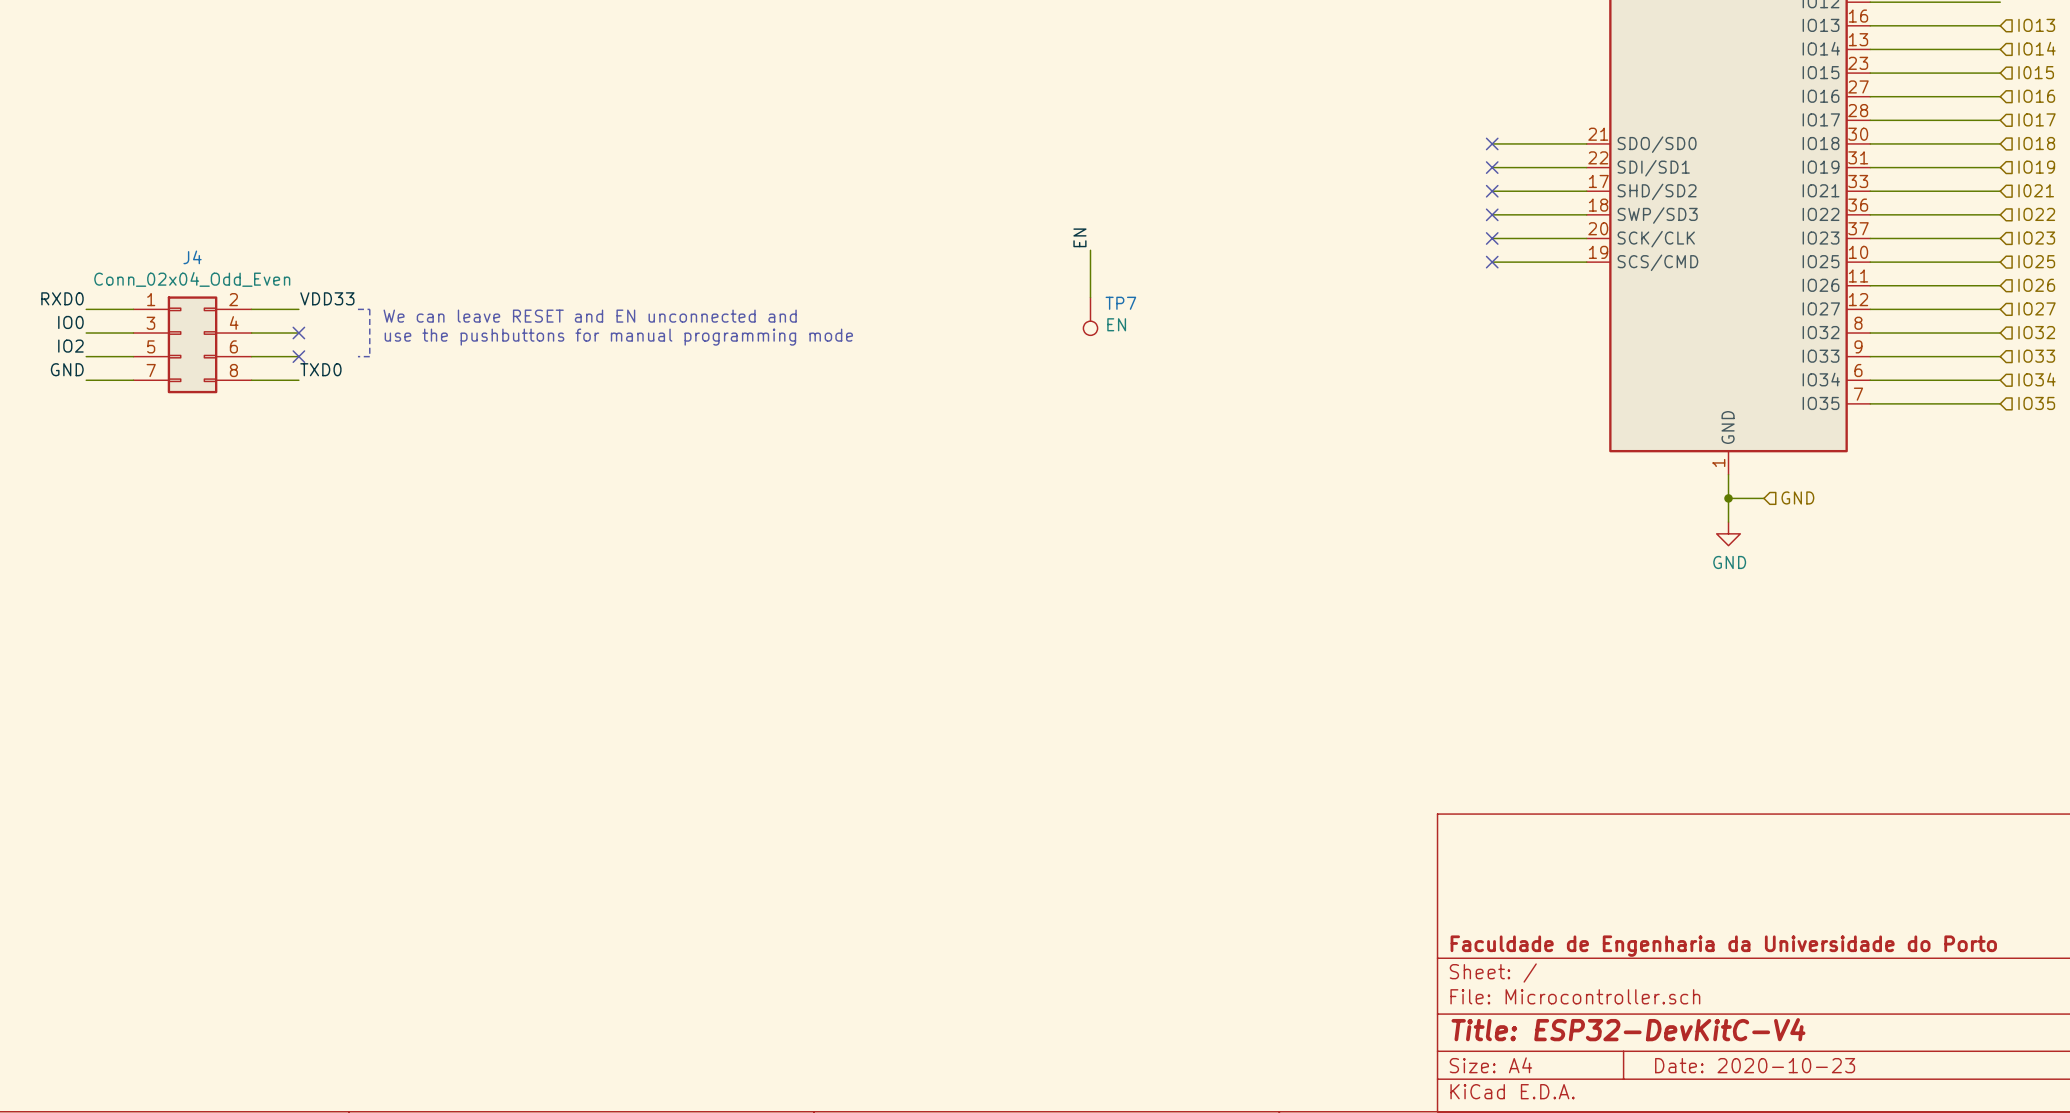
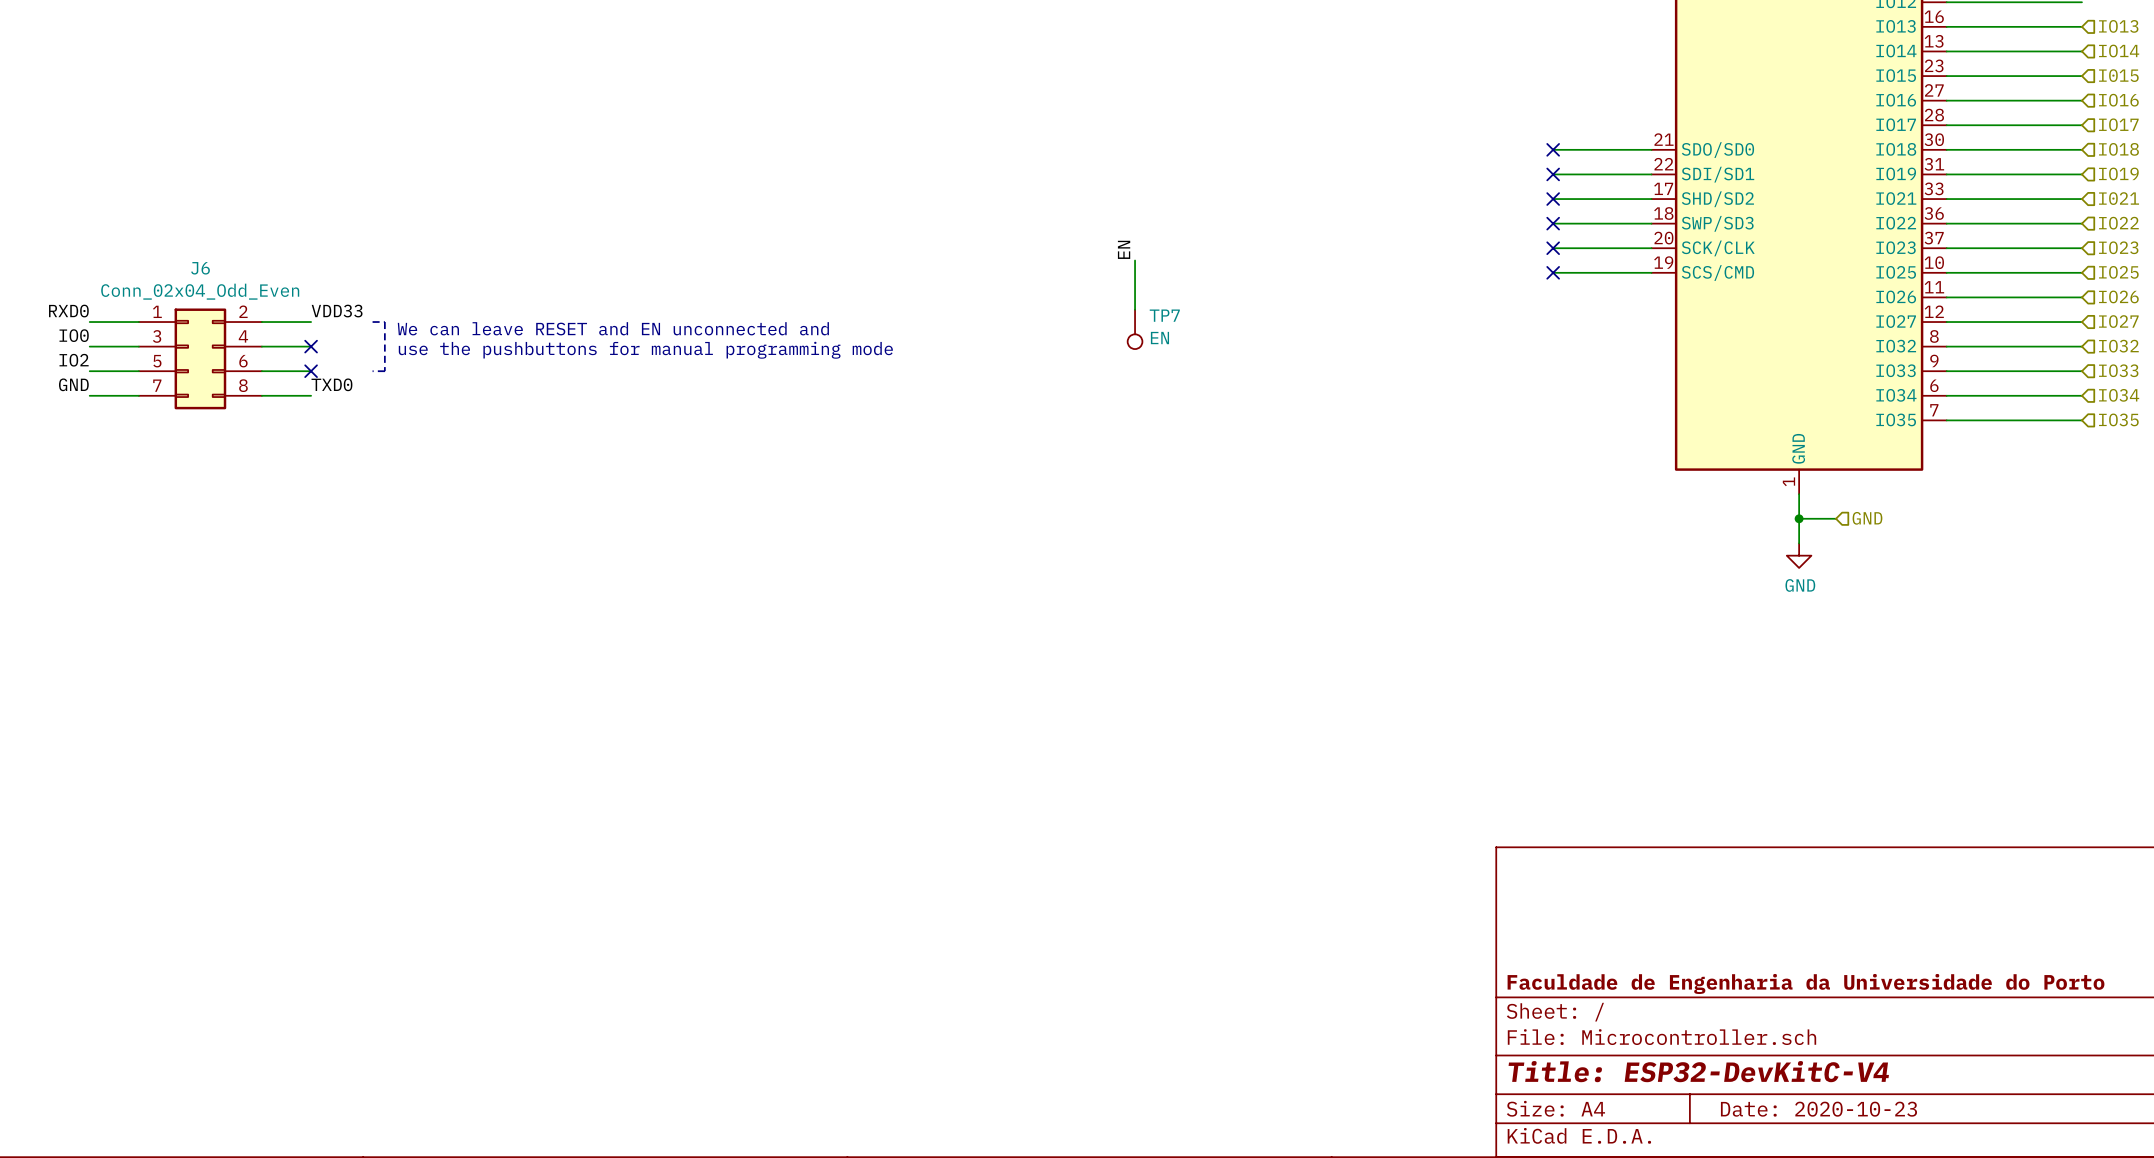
J4 name: J4 (192, 257) -> J6 (200, 268)

